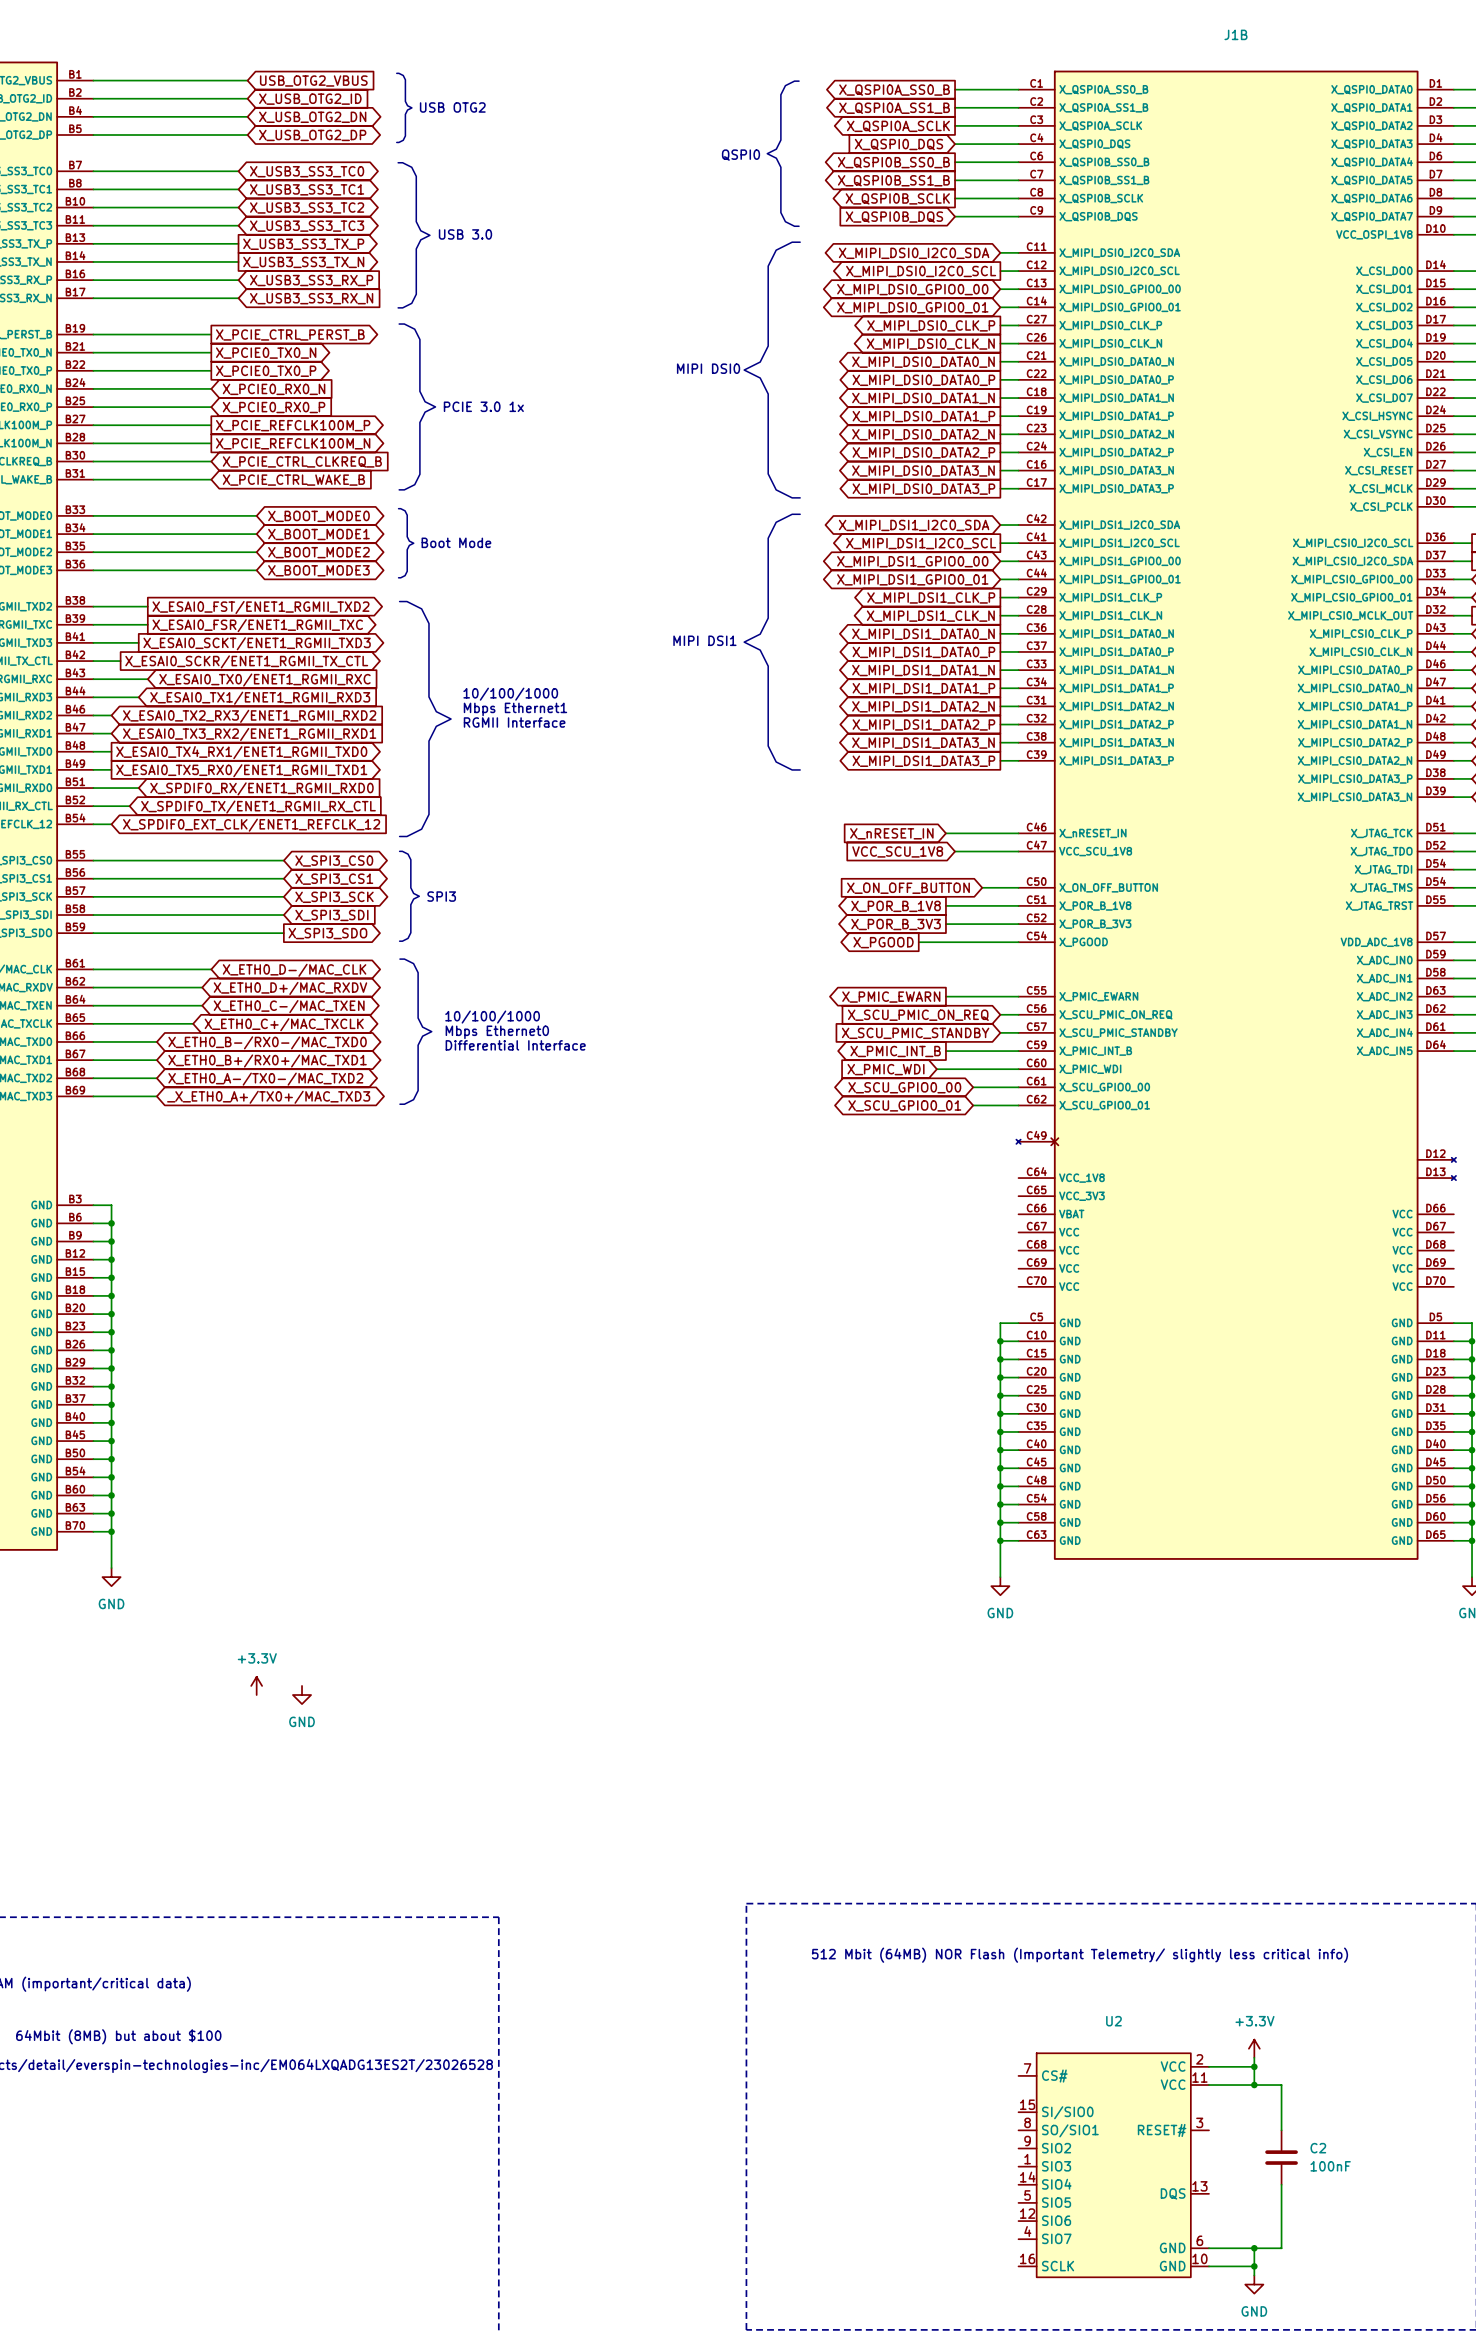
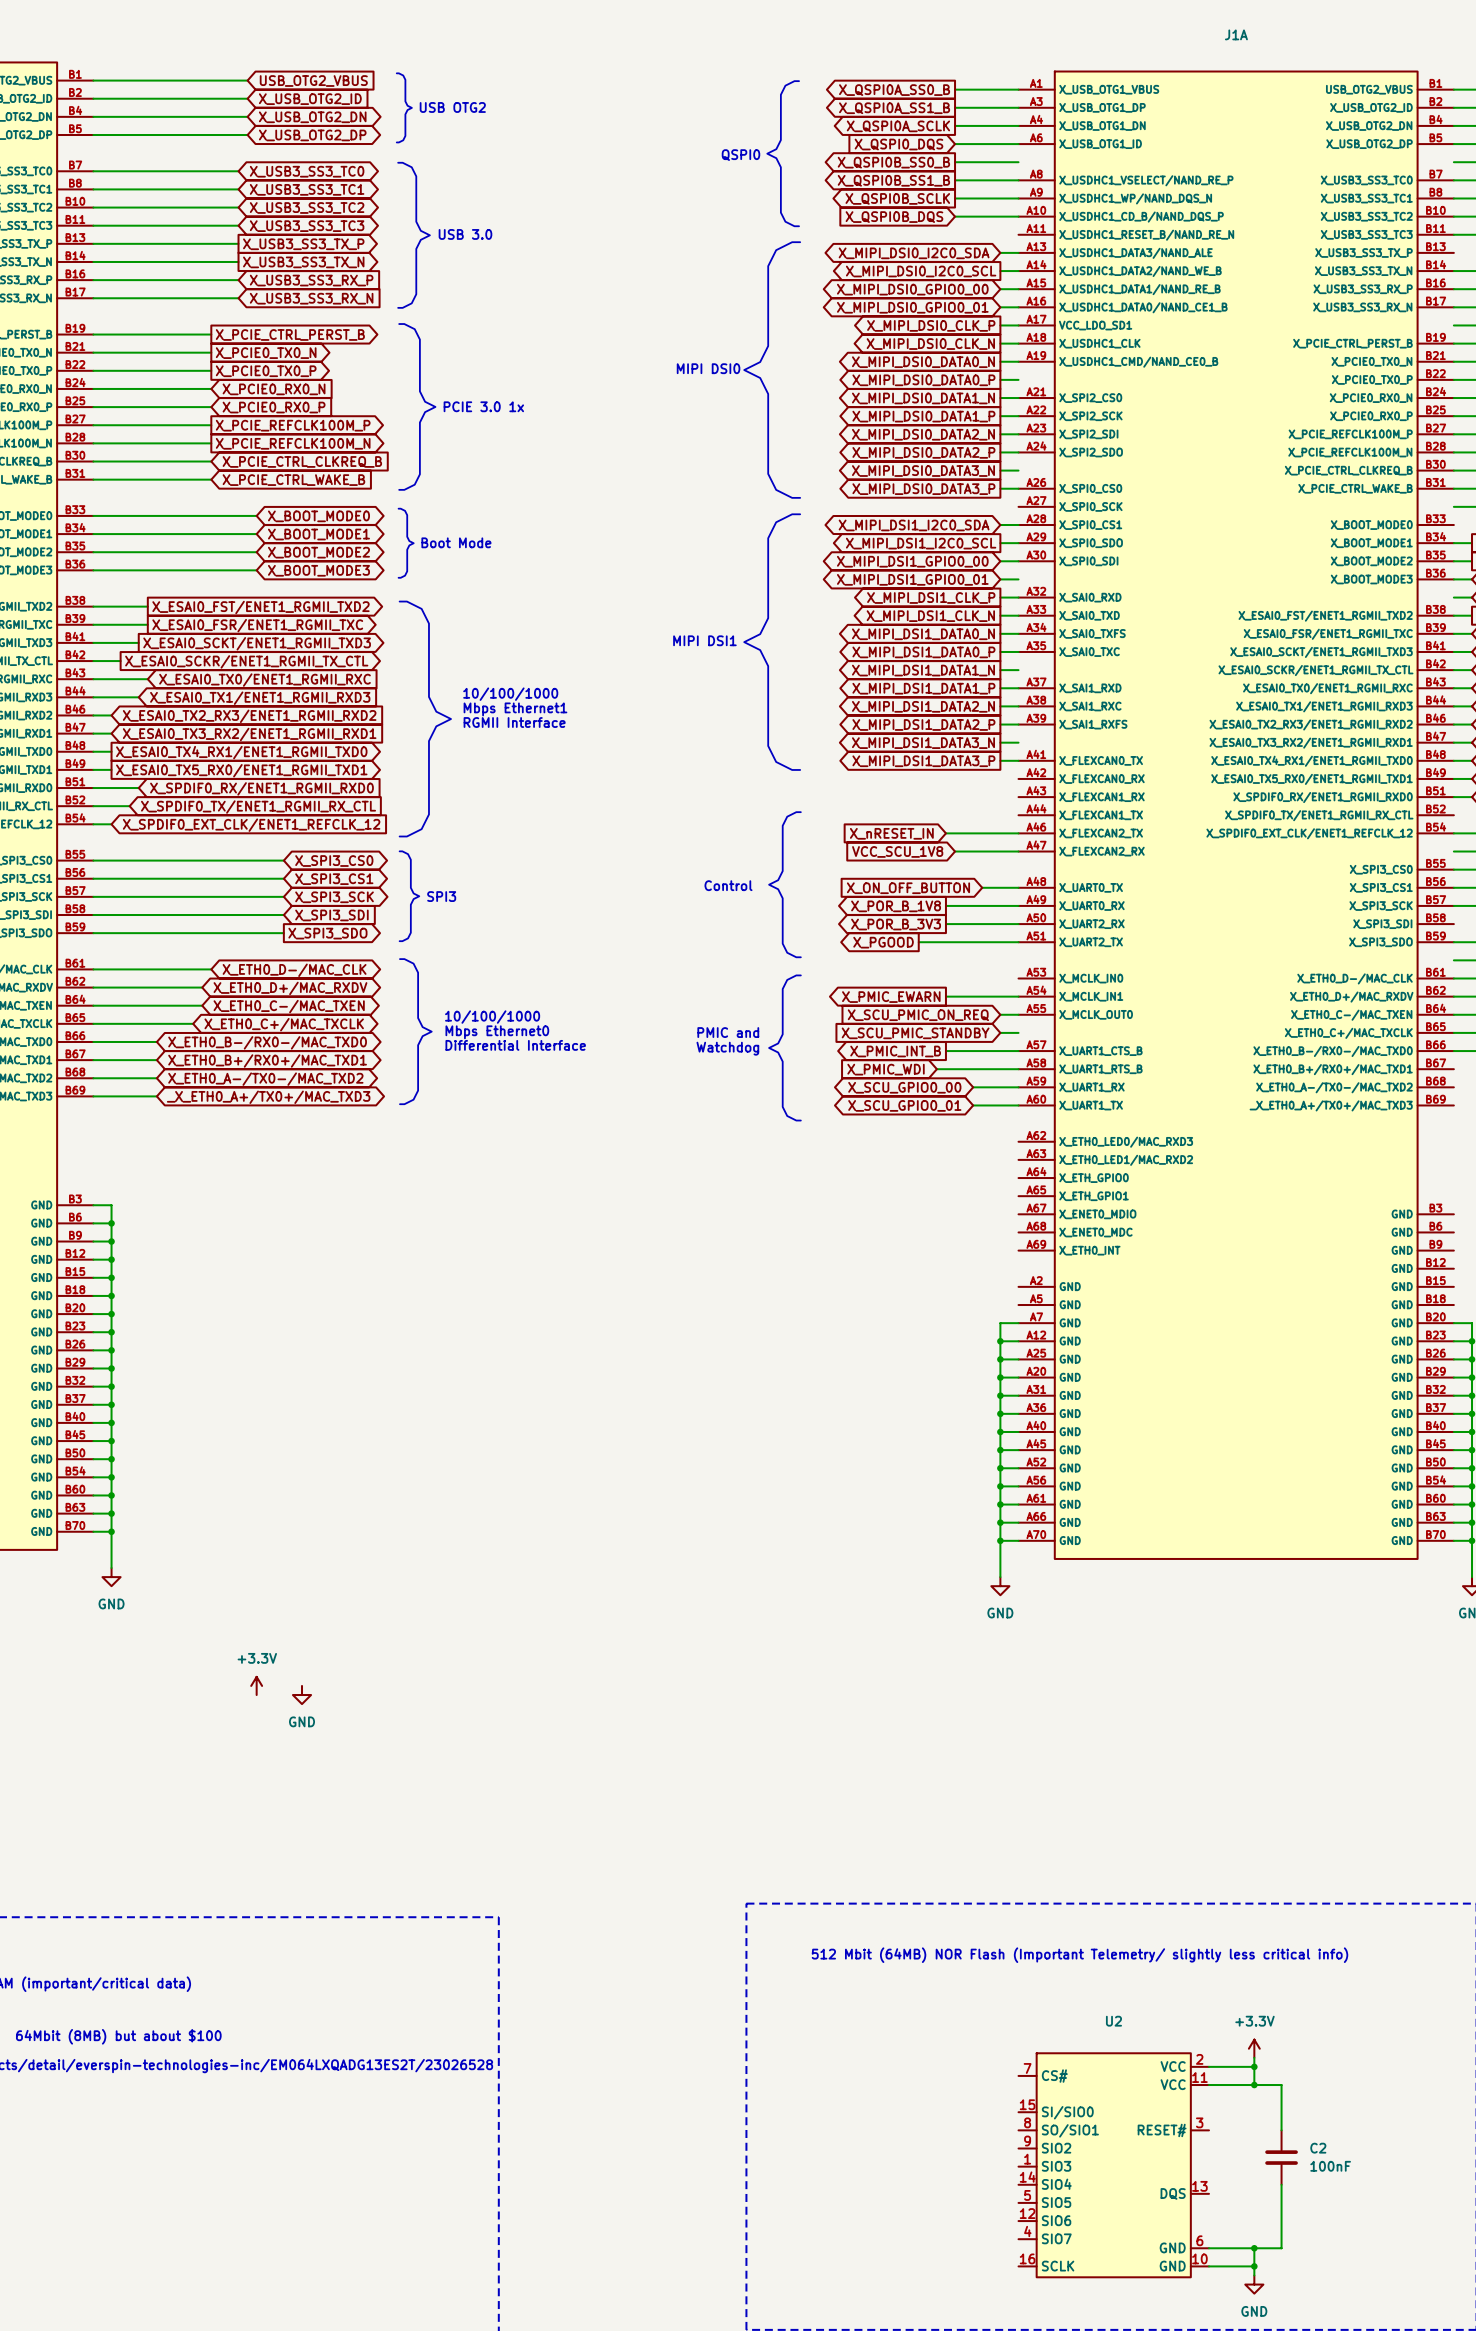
J1B: (1236, 815) -> none
J1A: none -> (1236, 815)
text: none -> { (784, 884)
text: none -> Control (728, 885)
text: none -> PMIC and (728, 1032)
text: none -> { (784, 1047)
text: none -> Watchdog (727, 1048)

